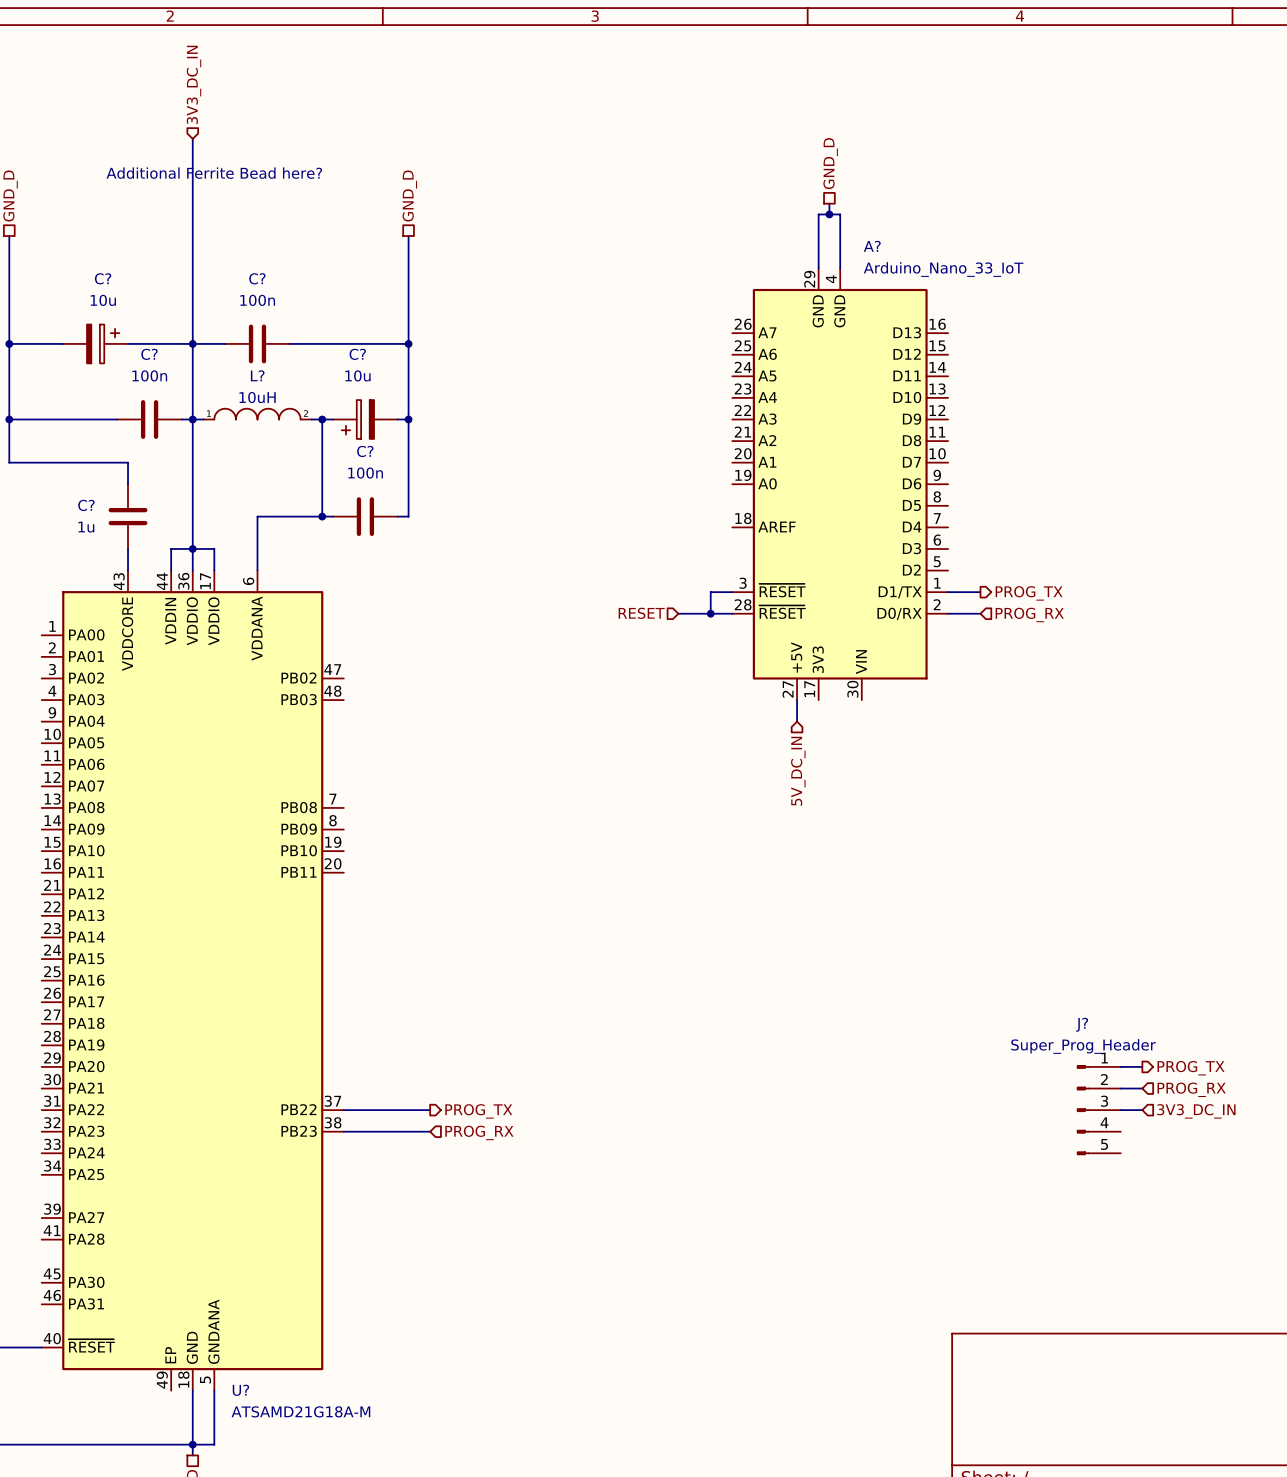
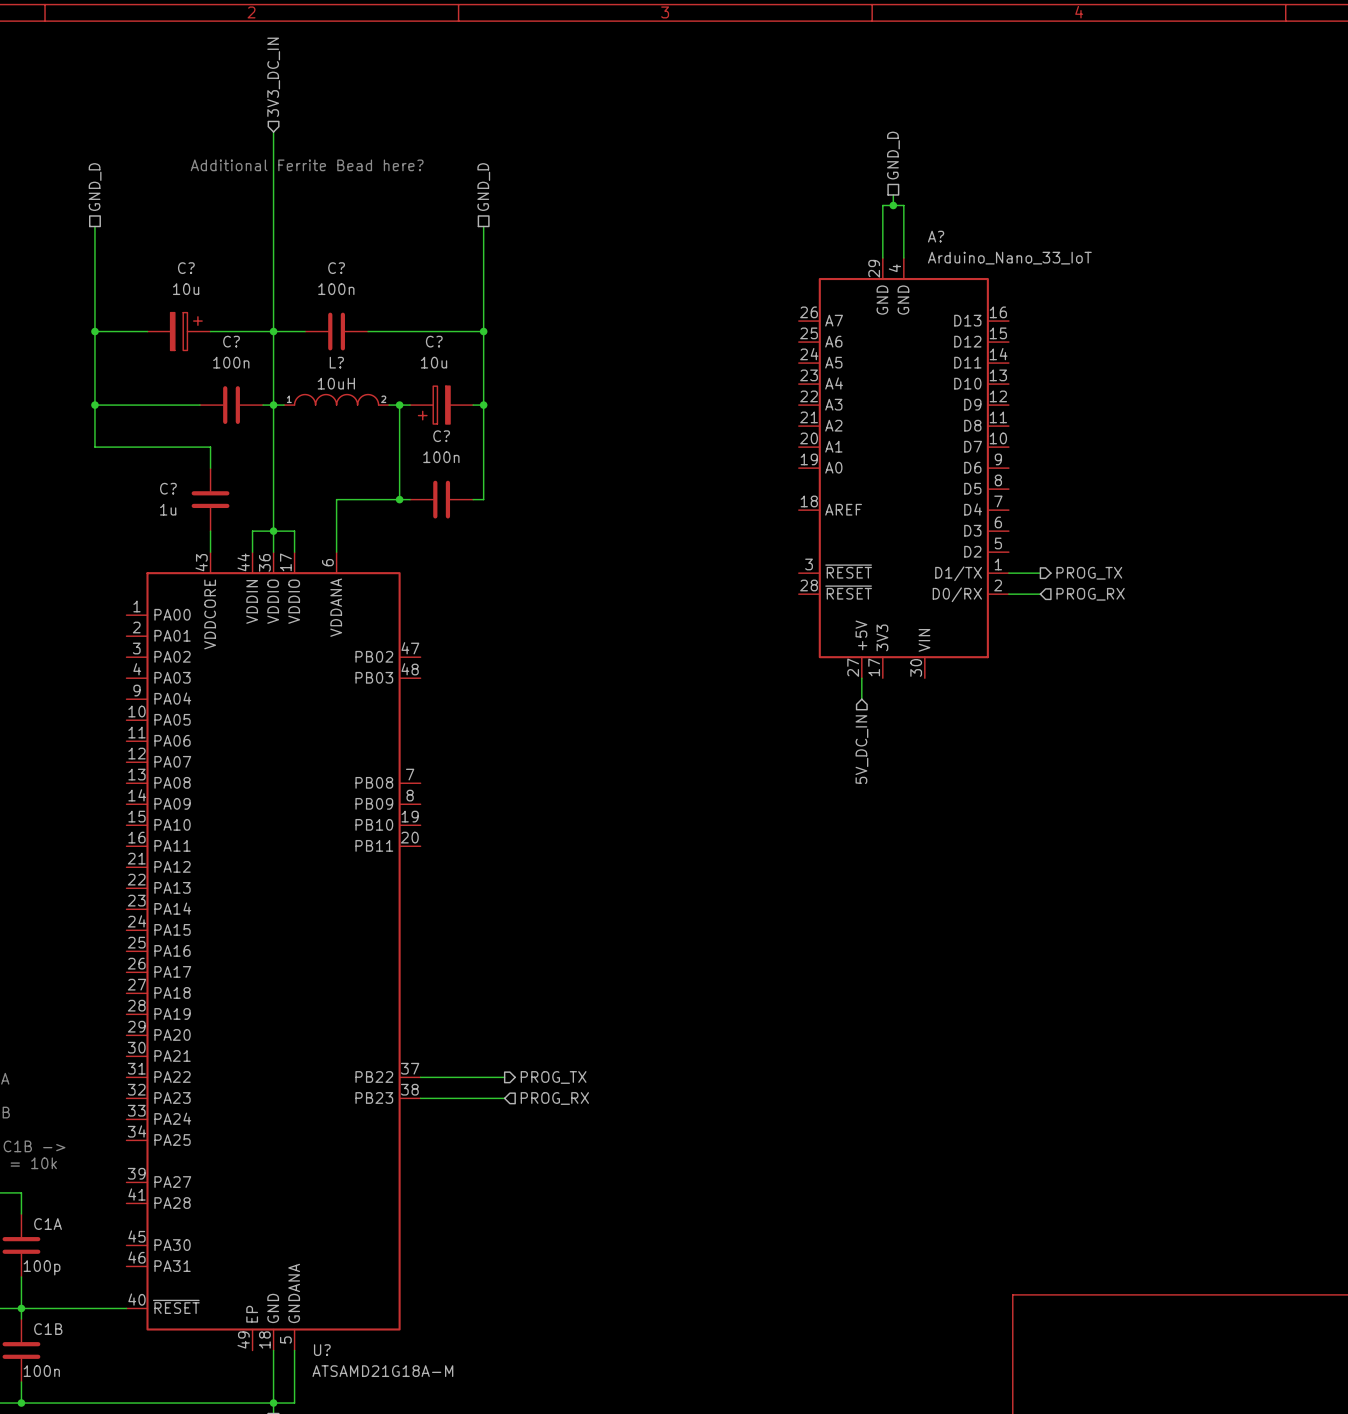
wire: (732, 592) (710, 592) (710, 613) -> none
hierarchical label: RESET (641, 613) -> none
wire: (678, 613) (732, 613) -> none
junction: (710, 613) -> none
wire: (1120, 1066) (1142, 1066) -> none
hierarchical label: PROG_TX (1191, 1068) -> none
wire: (1120, 1088) (1142, 1088) -> none
hierarchical label: PROG_RX (1191, 1089) -> none
J?: Super_Prog_Header (1098, 1110) -> none
wire: (1120, 1110) (1142, 1110) -> none
hierarchical label: 3V3_DC_IN (1196, 1111) -> none

